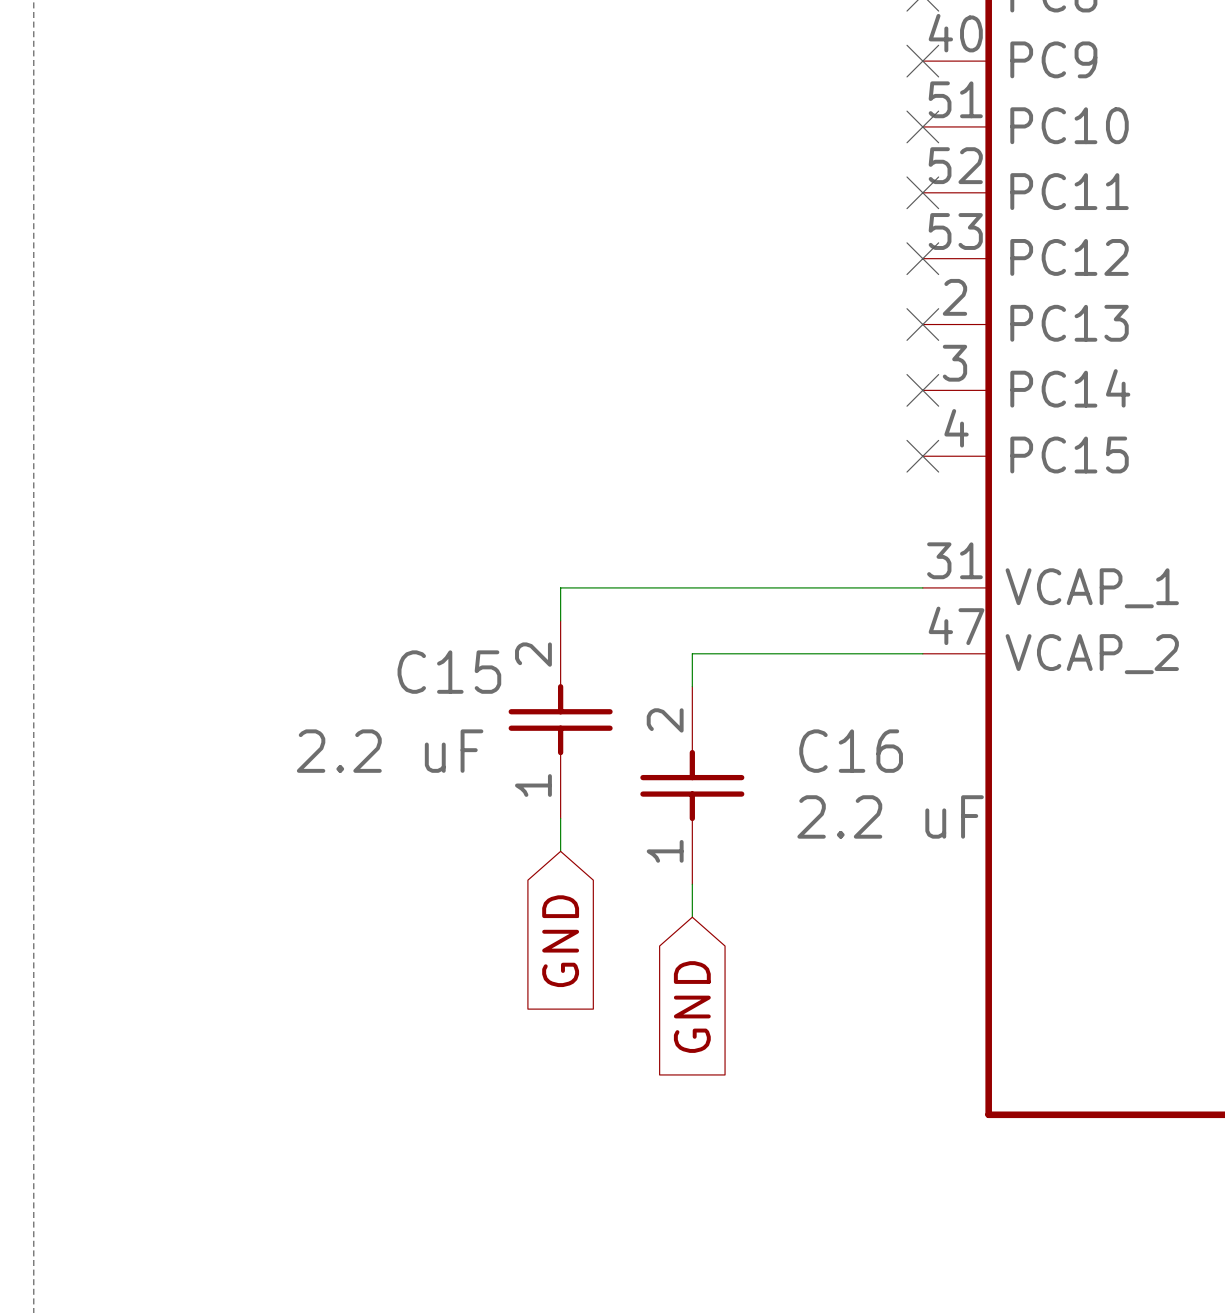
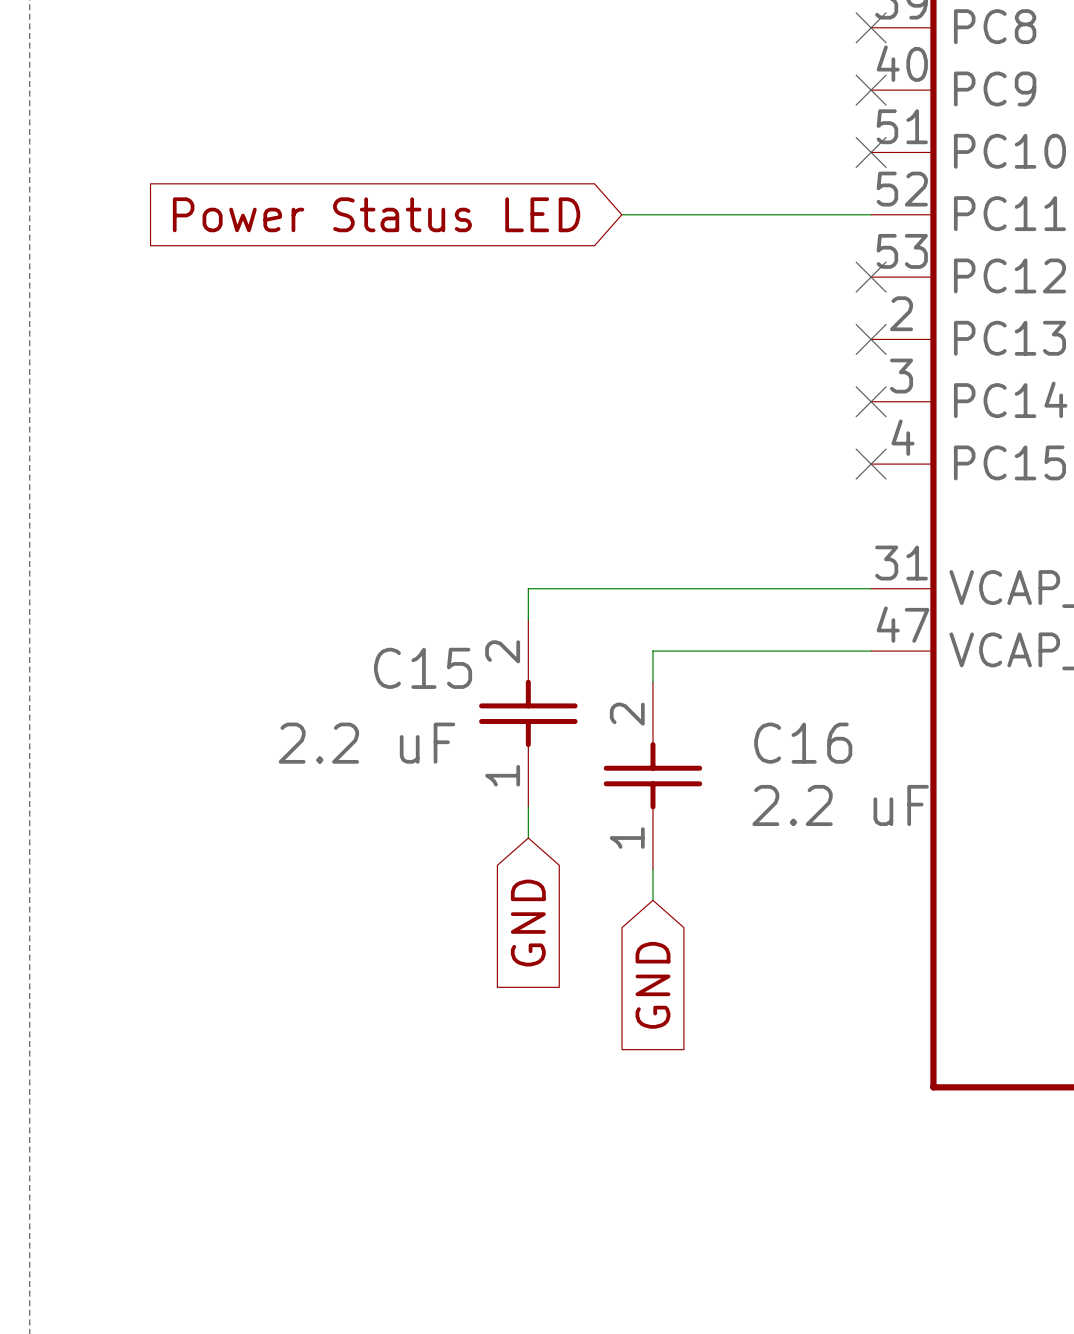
global label: none -> Power Status LED (376, 214)
wire: none -> (621, 214) (871, 214)
no-connect mark: (922, 192) -> none

